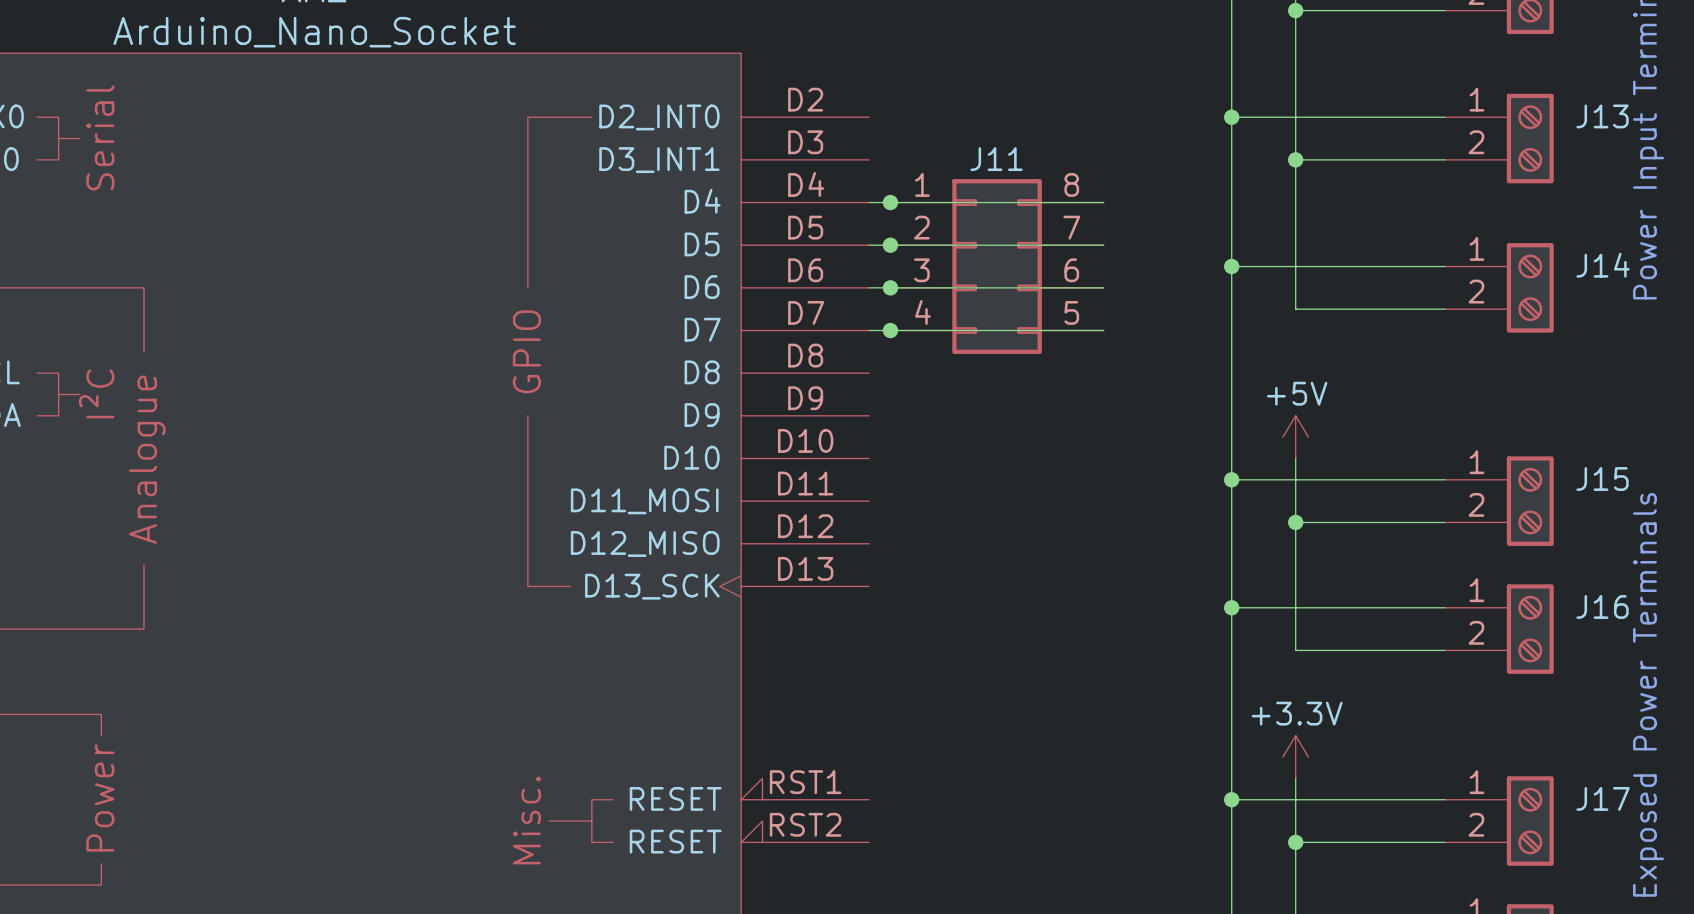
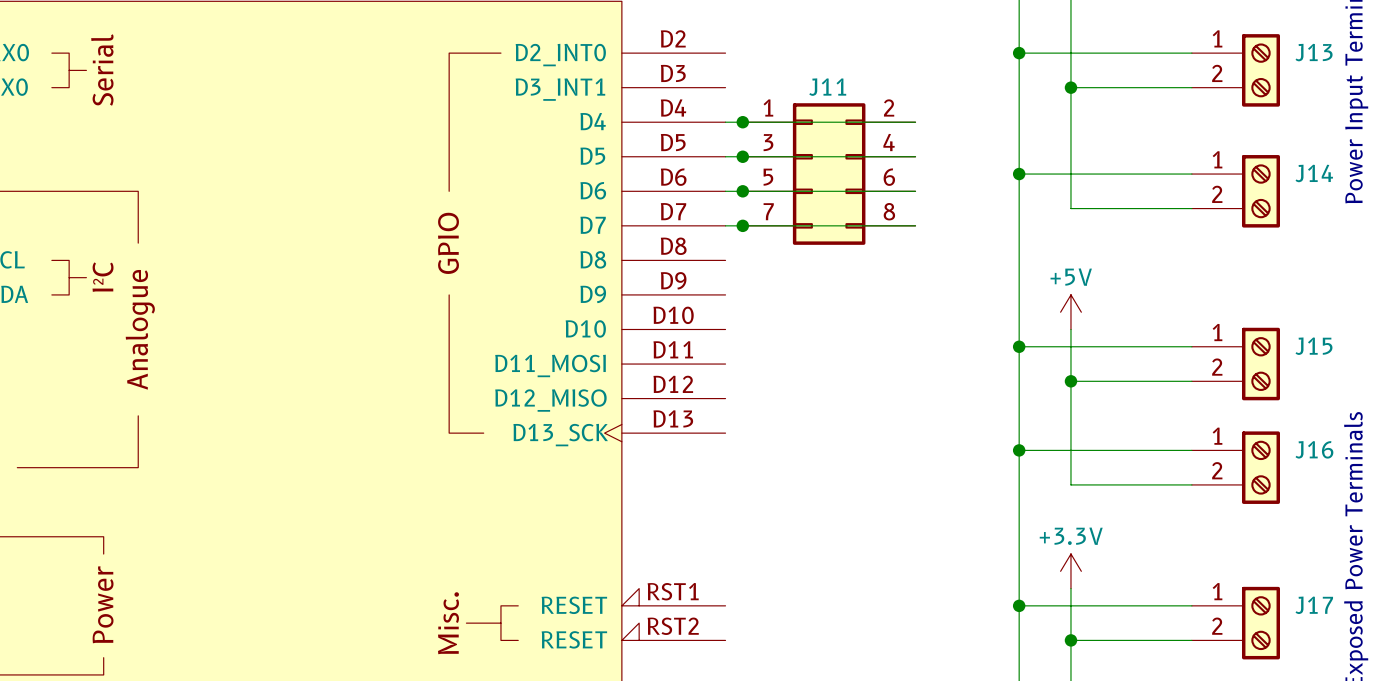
J11 pin number: 8 (1071, 184) -> 2 (889, 107)
J11 pin number: 2 (921, 227) -> 3 (768, 142)
J11 pin number: 7 (1071, 227) -> 4 (889, 142)
J11 pin number: 3 (921, 270) -> 5 (768, 177)
J11 pin number: 4 (922, 312) -> 7 (768, 211)
J11 pin number: 5 (1071, 312) -> 8 (889, 211)

